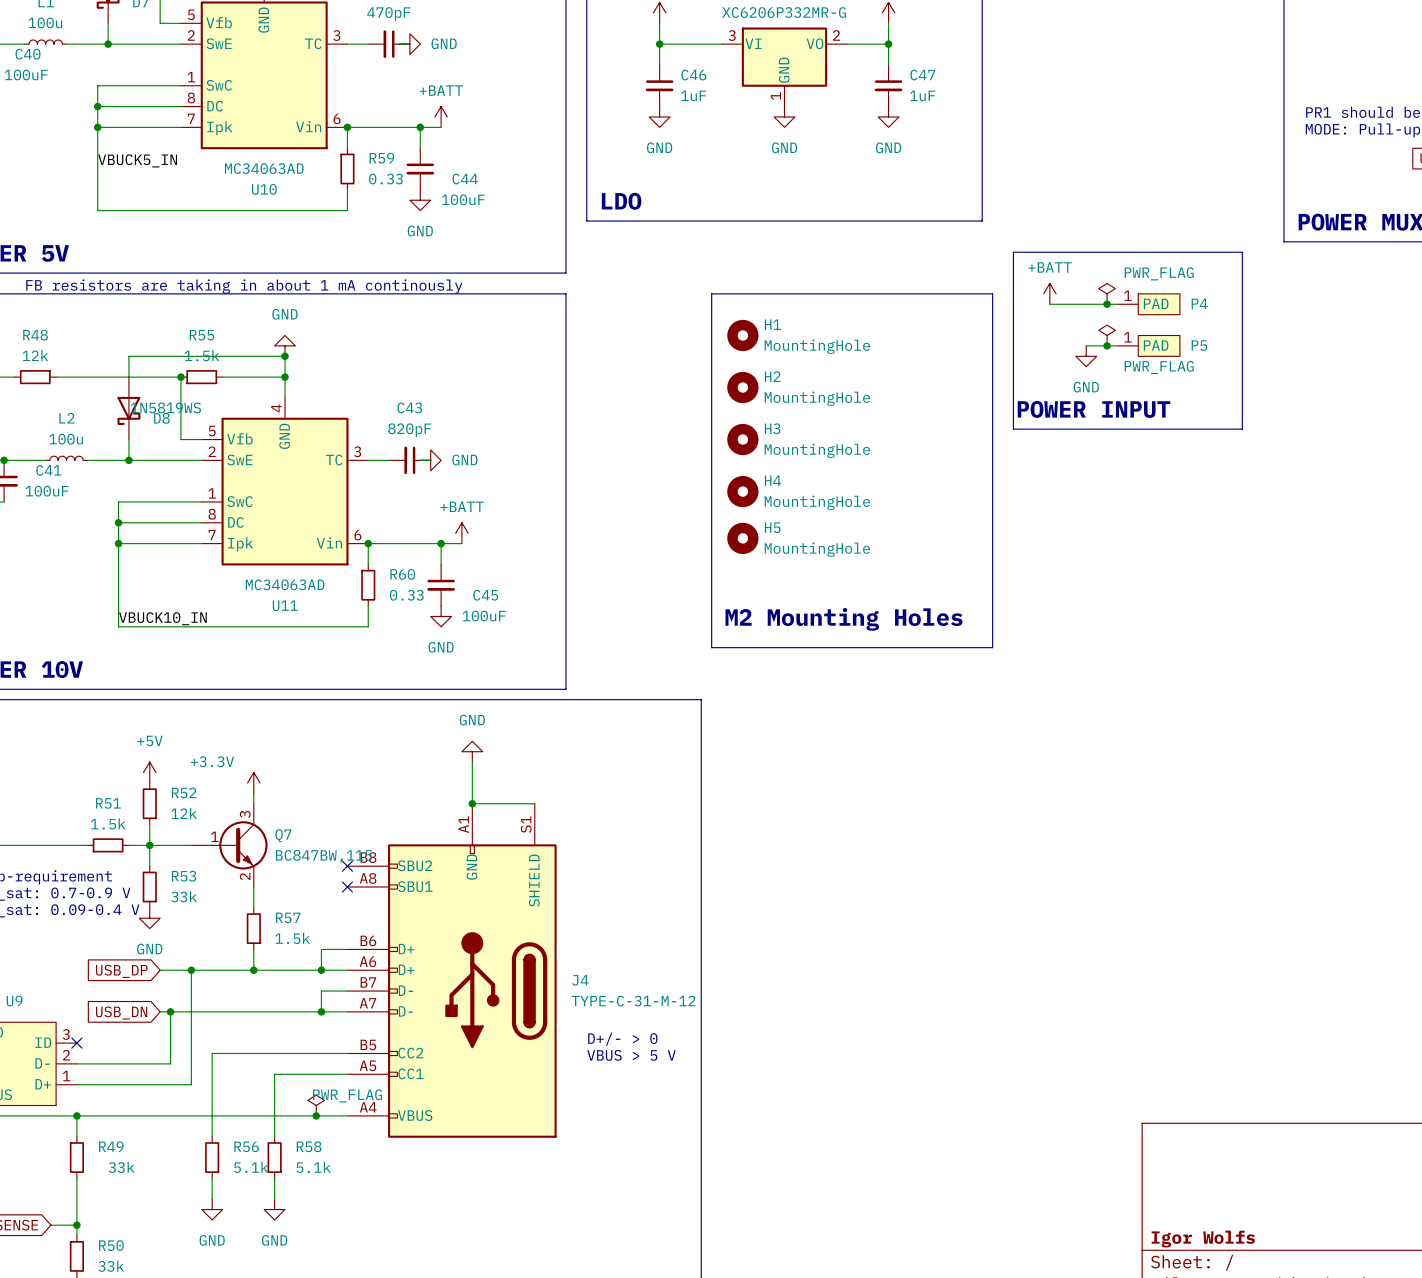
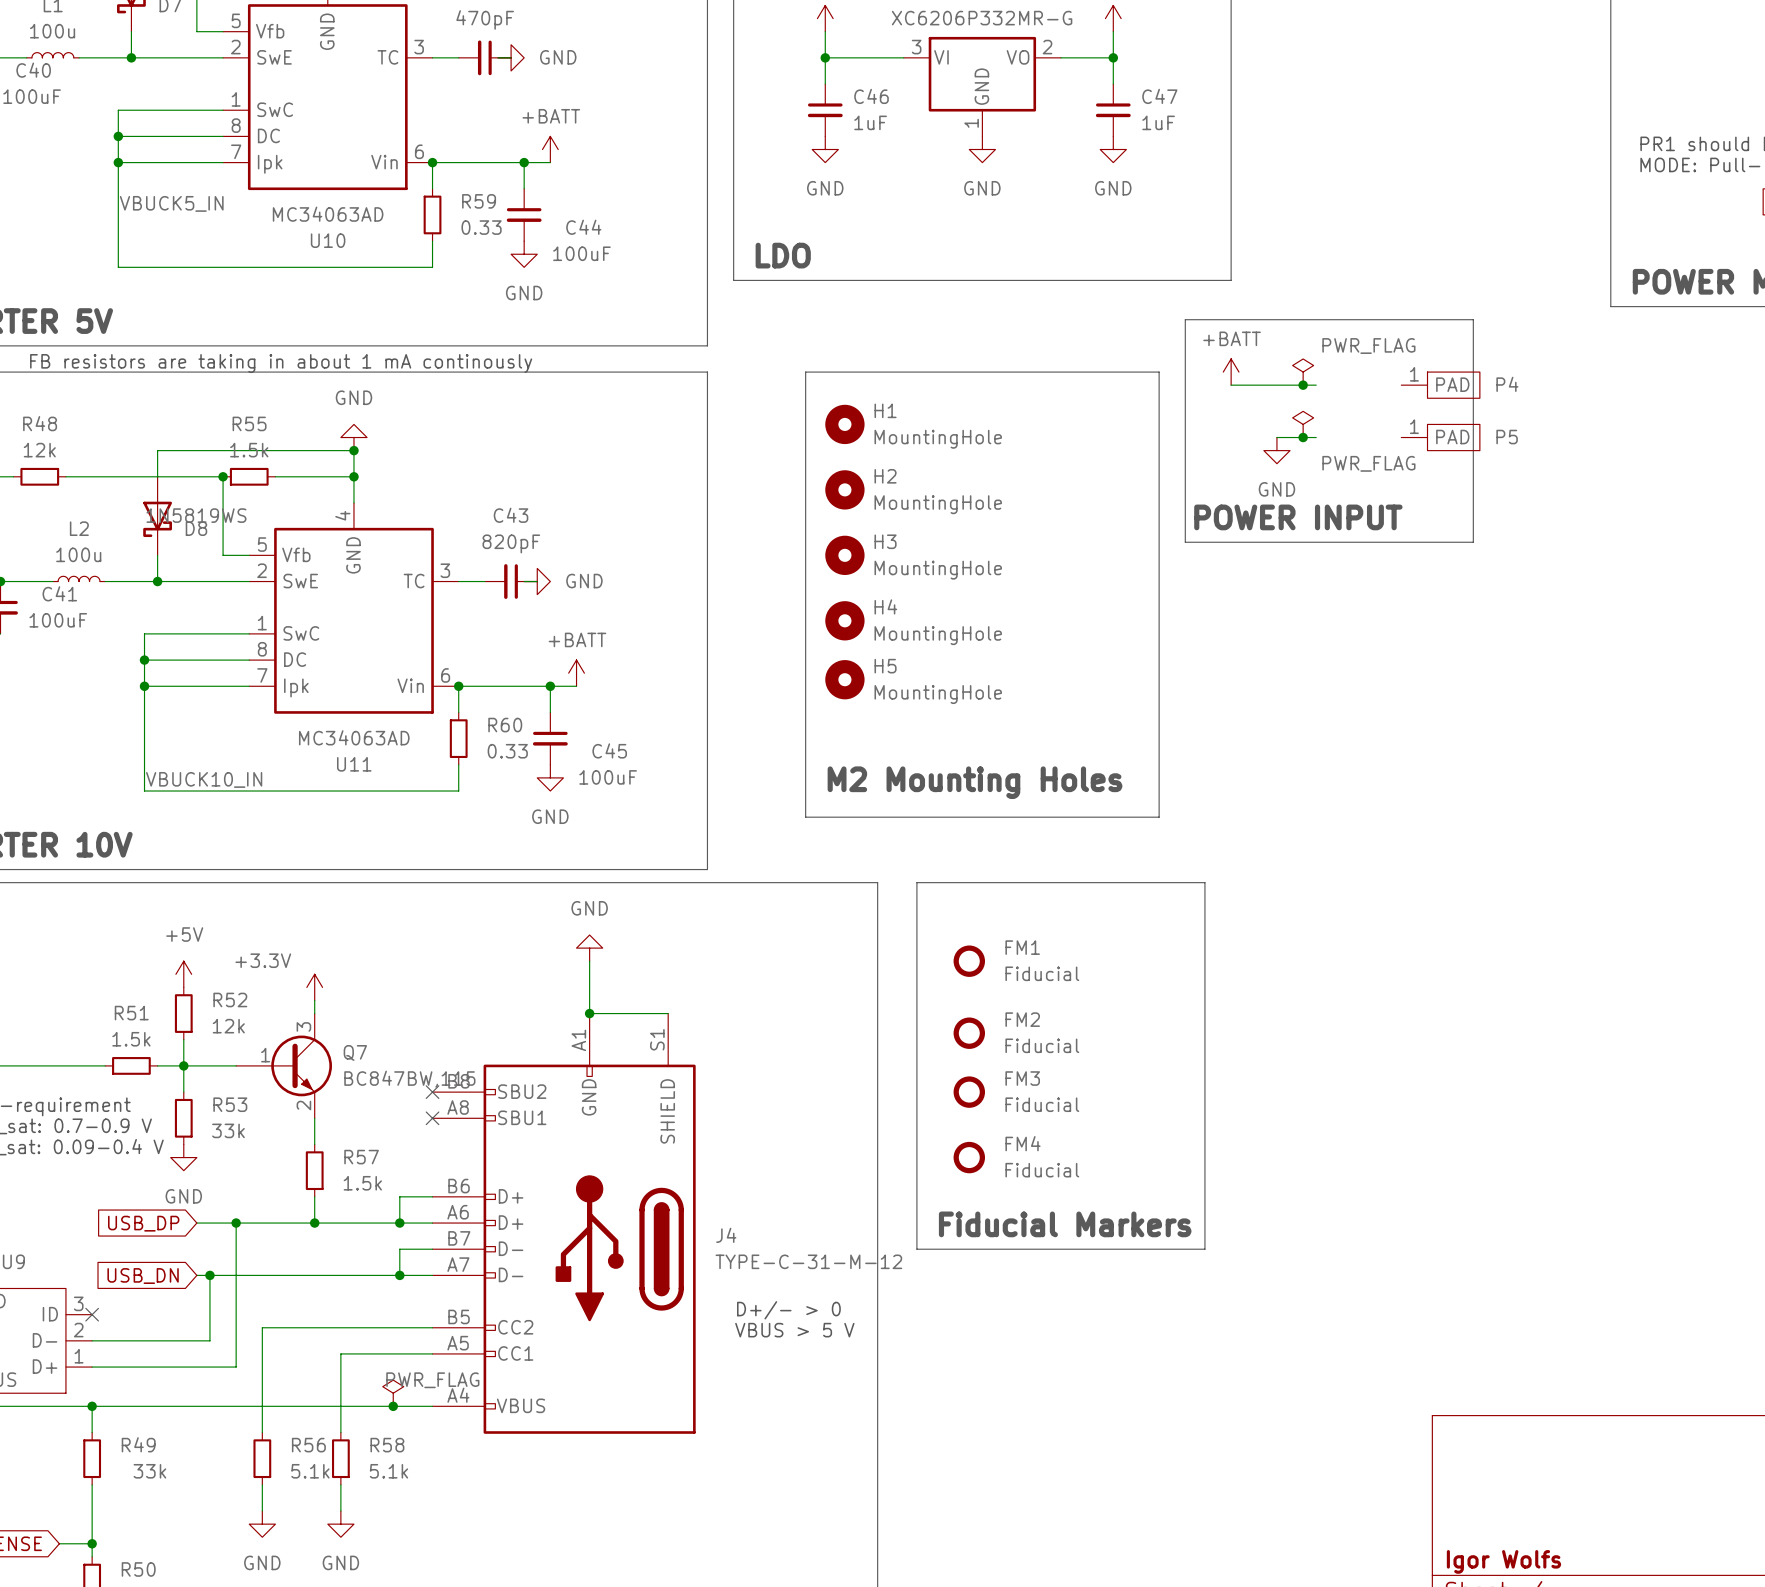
line: (1013, 252) (1013, 429) -> (1270, 319) (1185, 319) (1185, 542) (1270, 542)
line: (1174, 252) (1242, 252) (1242, 429) (1174, 429) -> (1473, 319) (1473, 542)
line: (711, 293) (711, 647) -> (890, 372) (805, 372) (805, 817) (890, 817)
line: (924, 293) (992, 293) (992, 647) (924, 647) -> (1159, 372) (1159, 817)
power symbol: none -> PWR_FLAG (1303, 372)
power symbol position: +BATT (1049, 293) -> +BATT (1231, 372)
power symbol: PWR_FLAG (1107, 293) -> none
junction: none -> (1303, 385)
wire: (1049, 304) (1117, 304) -> (1316, 385) (1231, 385)
junction: (1107, 304) -> none
H1 position: (742, 335) -> (844, 424)
power symbol: none -> PWR_FLAG (1303, 424)
power symbol: PWR_FLAG (1107, 335) -> none
junction: none -> (1303, 437)
wire: (1086, 345) (1117, 345) -> (1276, 437) (1316, 437)
junction: (1107, 345) -> none
power symbol position: GND (1086, 356) -> GND (1276, 450)
H2 position: (742, 387) -> (844, 489)
text position: POWER INPUT (1094, 409) -> POWER INPUT (1298, 517)
H3 position: (742, 439) -> (844, 555)
H4 position: (742, 491) -> (844, 620)
H5 position: (742, 538) -> (844, 679)
text position: M2 Mounting Holes (843, 619) -> M2 Mounting Holes (975, 782)
line: none -> (916, 882) (1204, 882) (1204, 1249) (916, 1249) (916, 882)
FM1: none -> Fiducial (969, 961)
FM2: none -> Fiducial (969, 1033)
FM3: none -> Fiducial (969, 1092)
FM4: none -> Fiducial (969, 1157)
text: none -> Fiducial Markers (1065, 1224)

